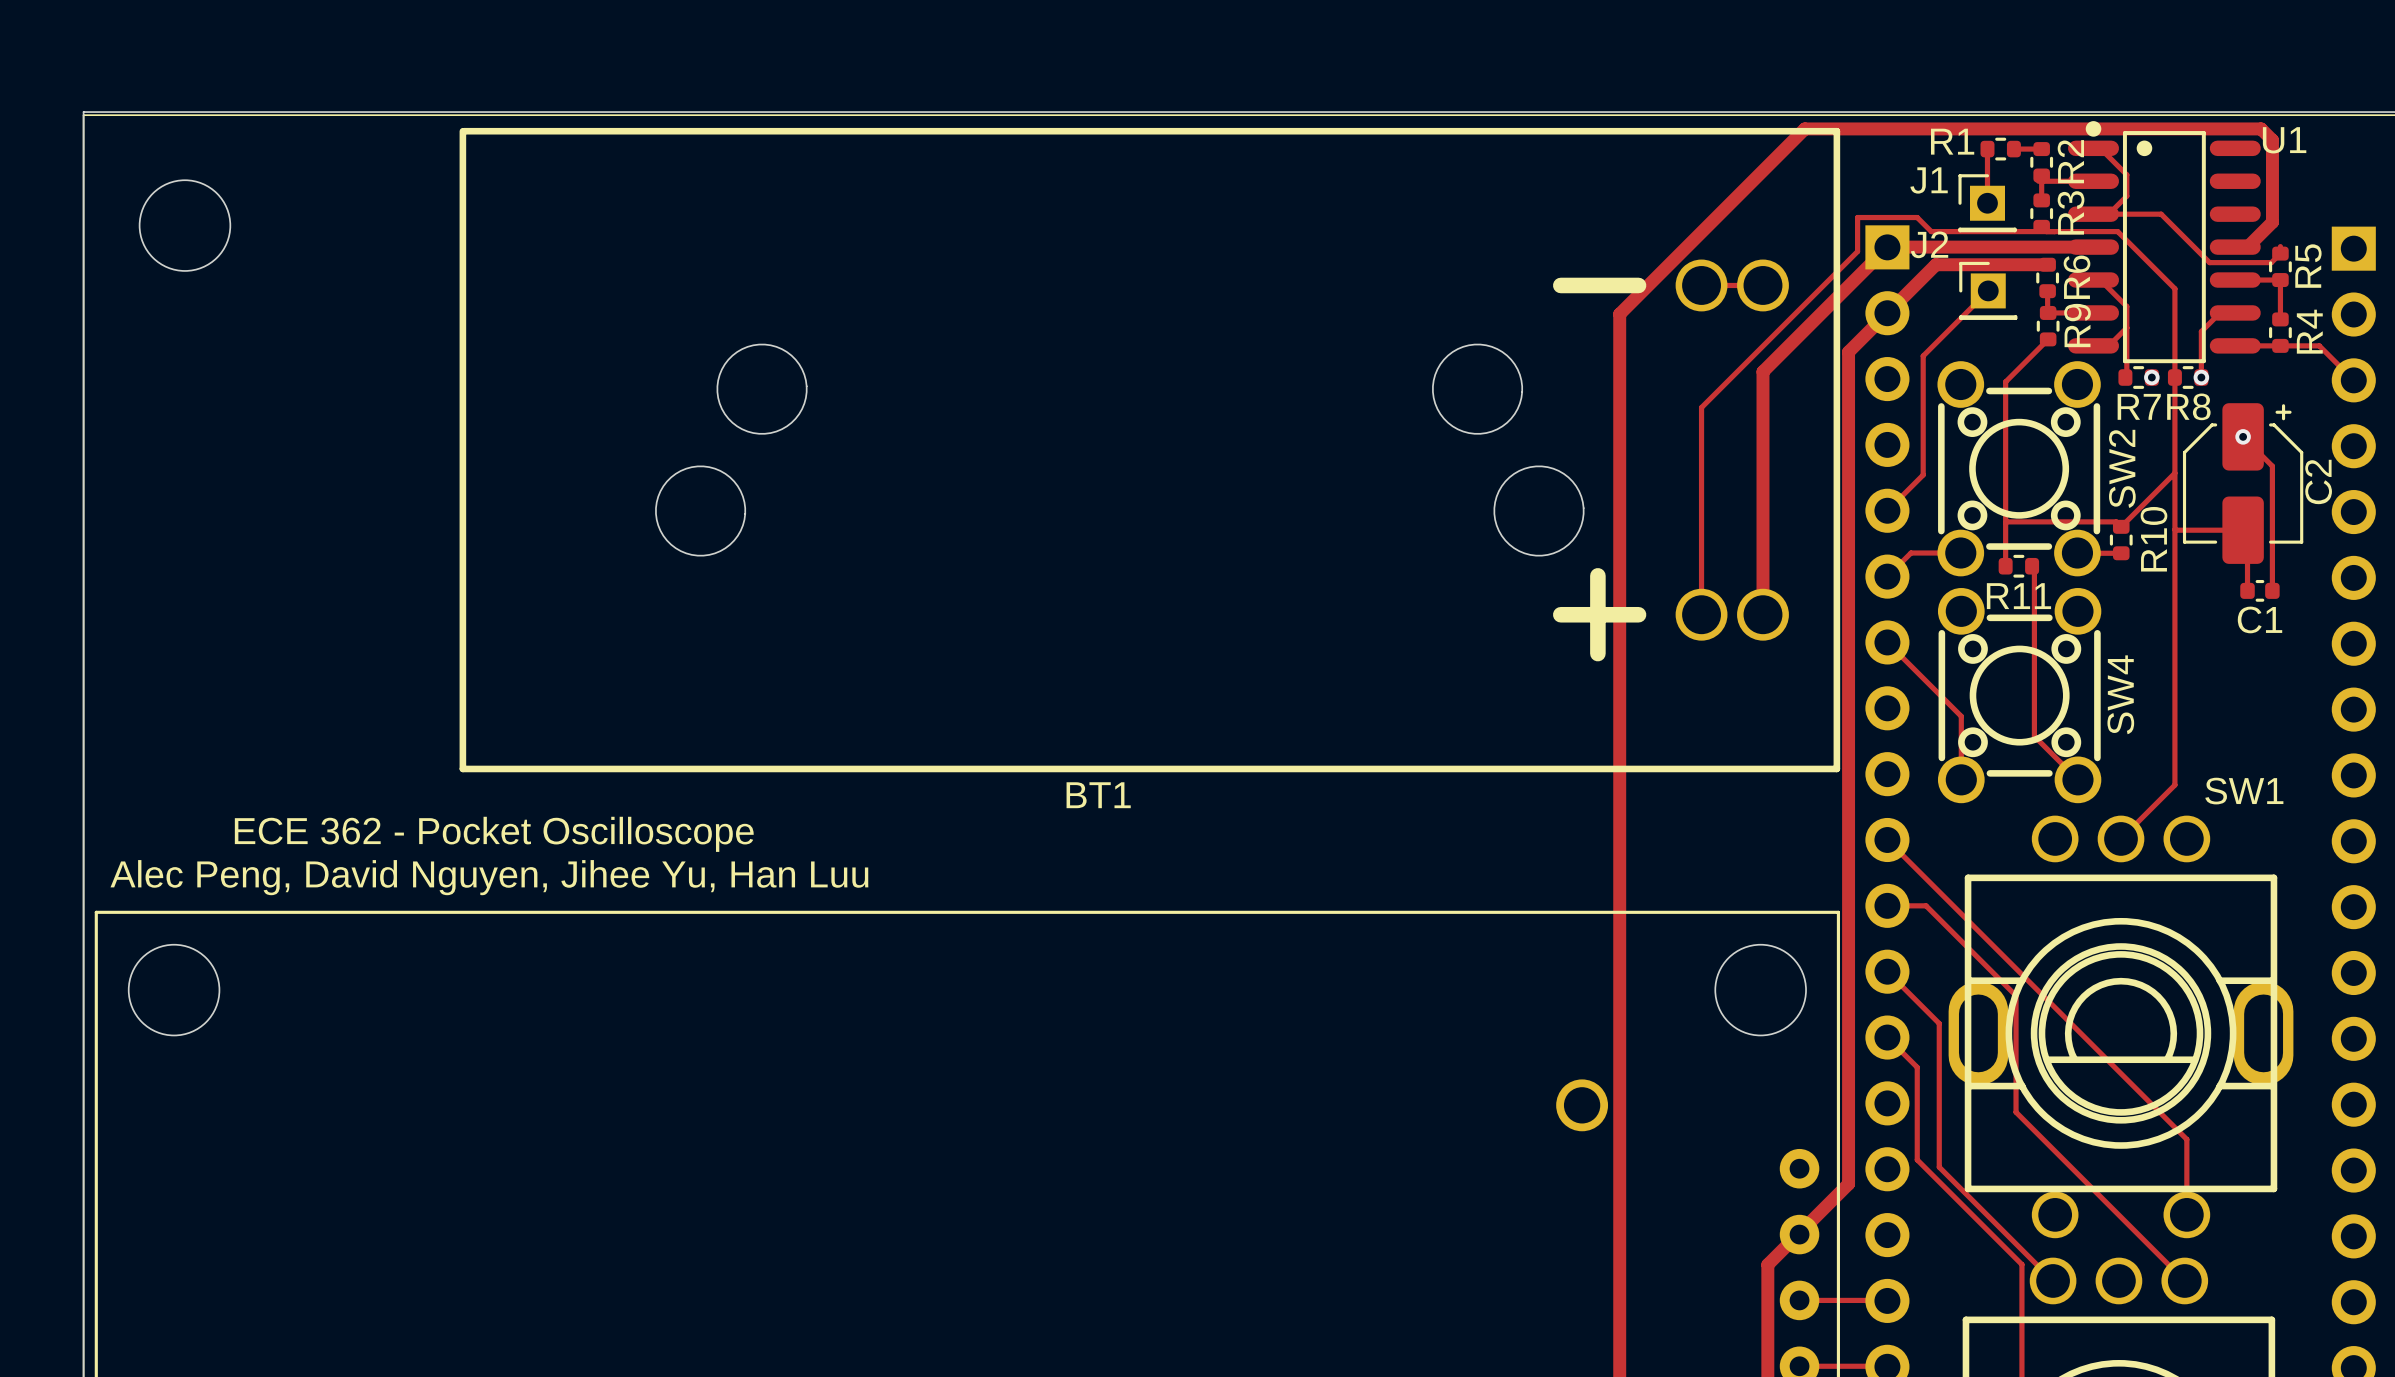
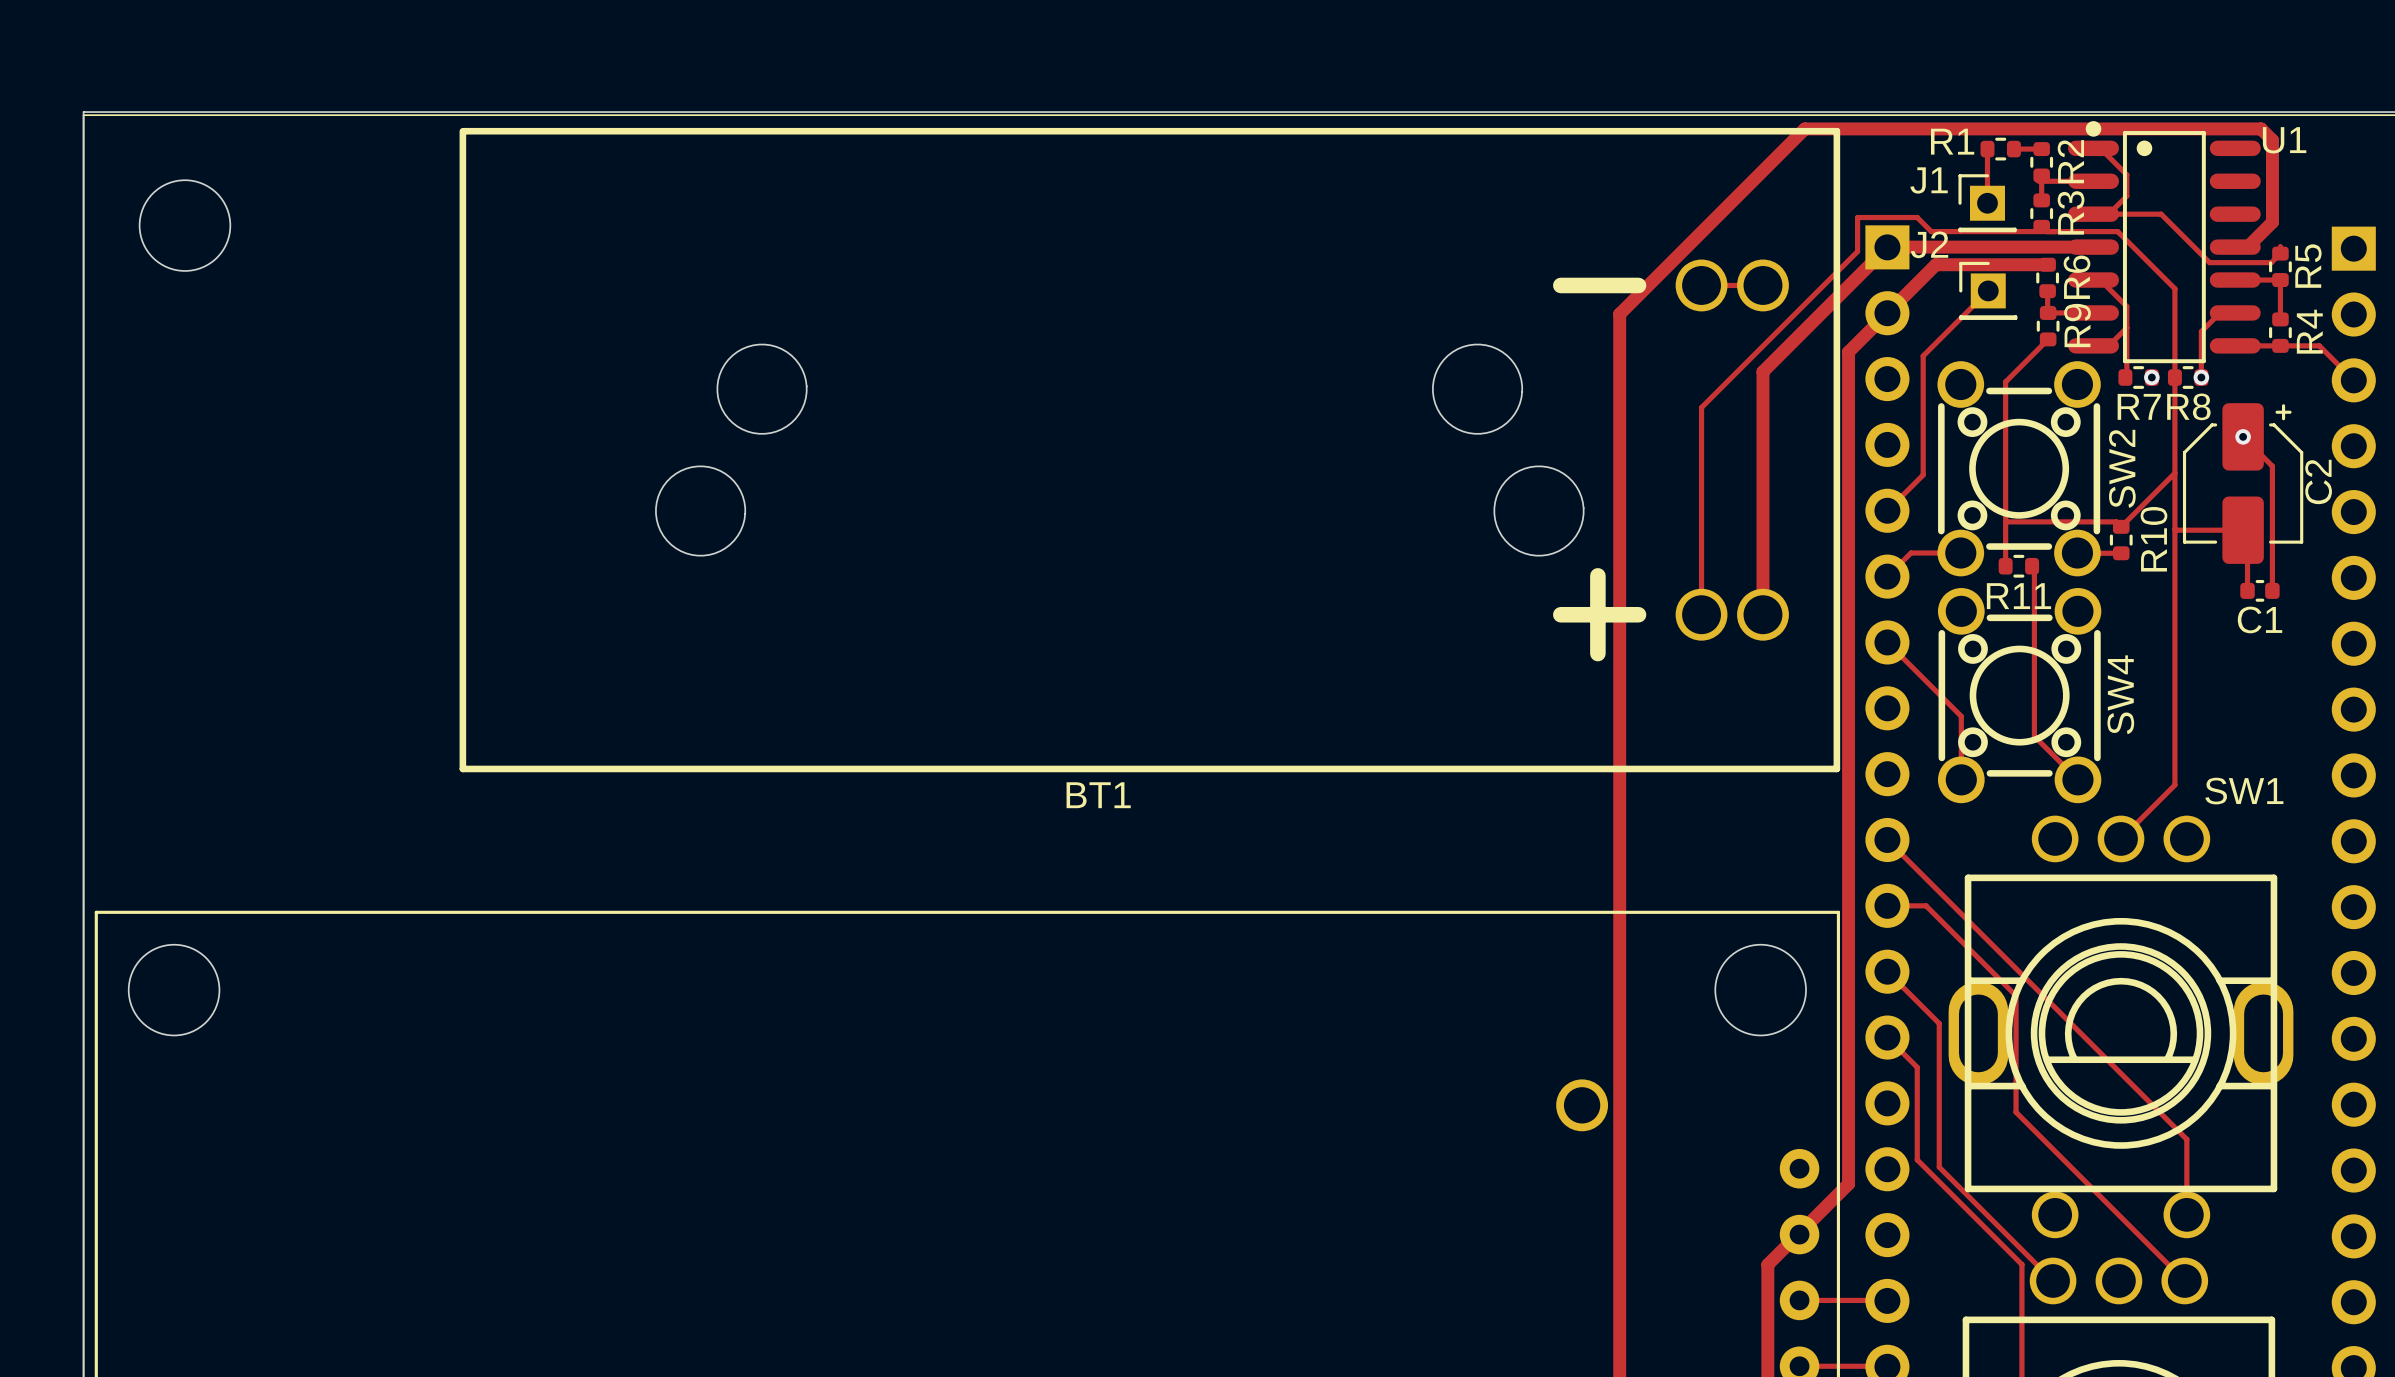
text: ECE 362 - Pocket Oscilloscope (494, 834) -> none
text: Alec Peng, David Nguyen, Jihee Yu, Han Luu (489, 877) -> none

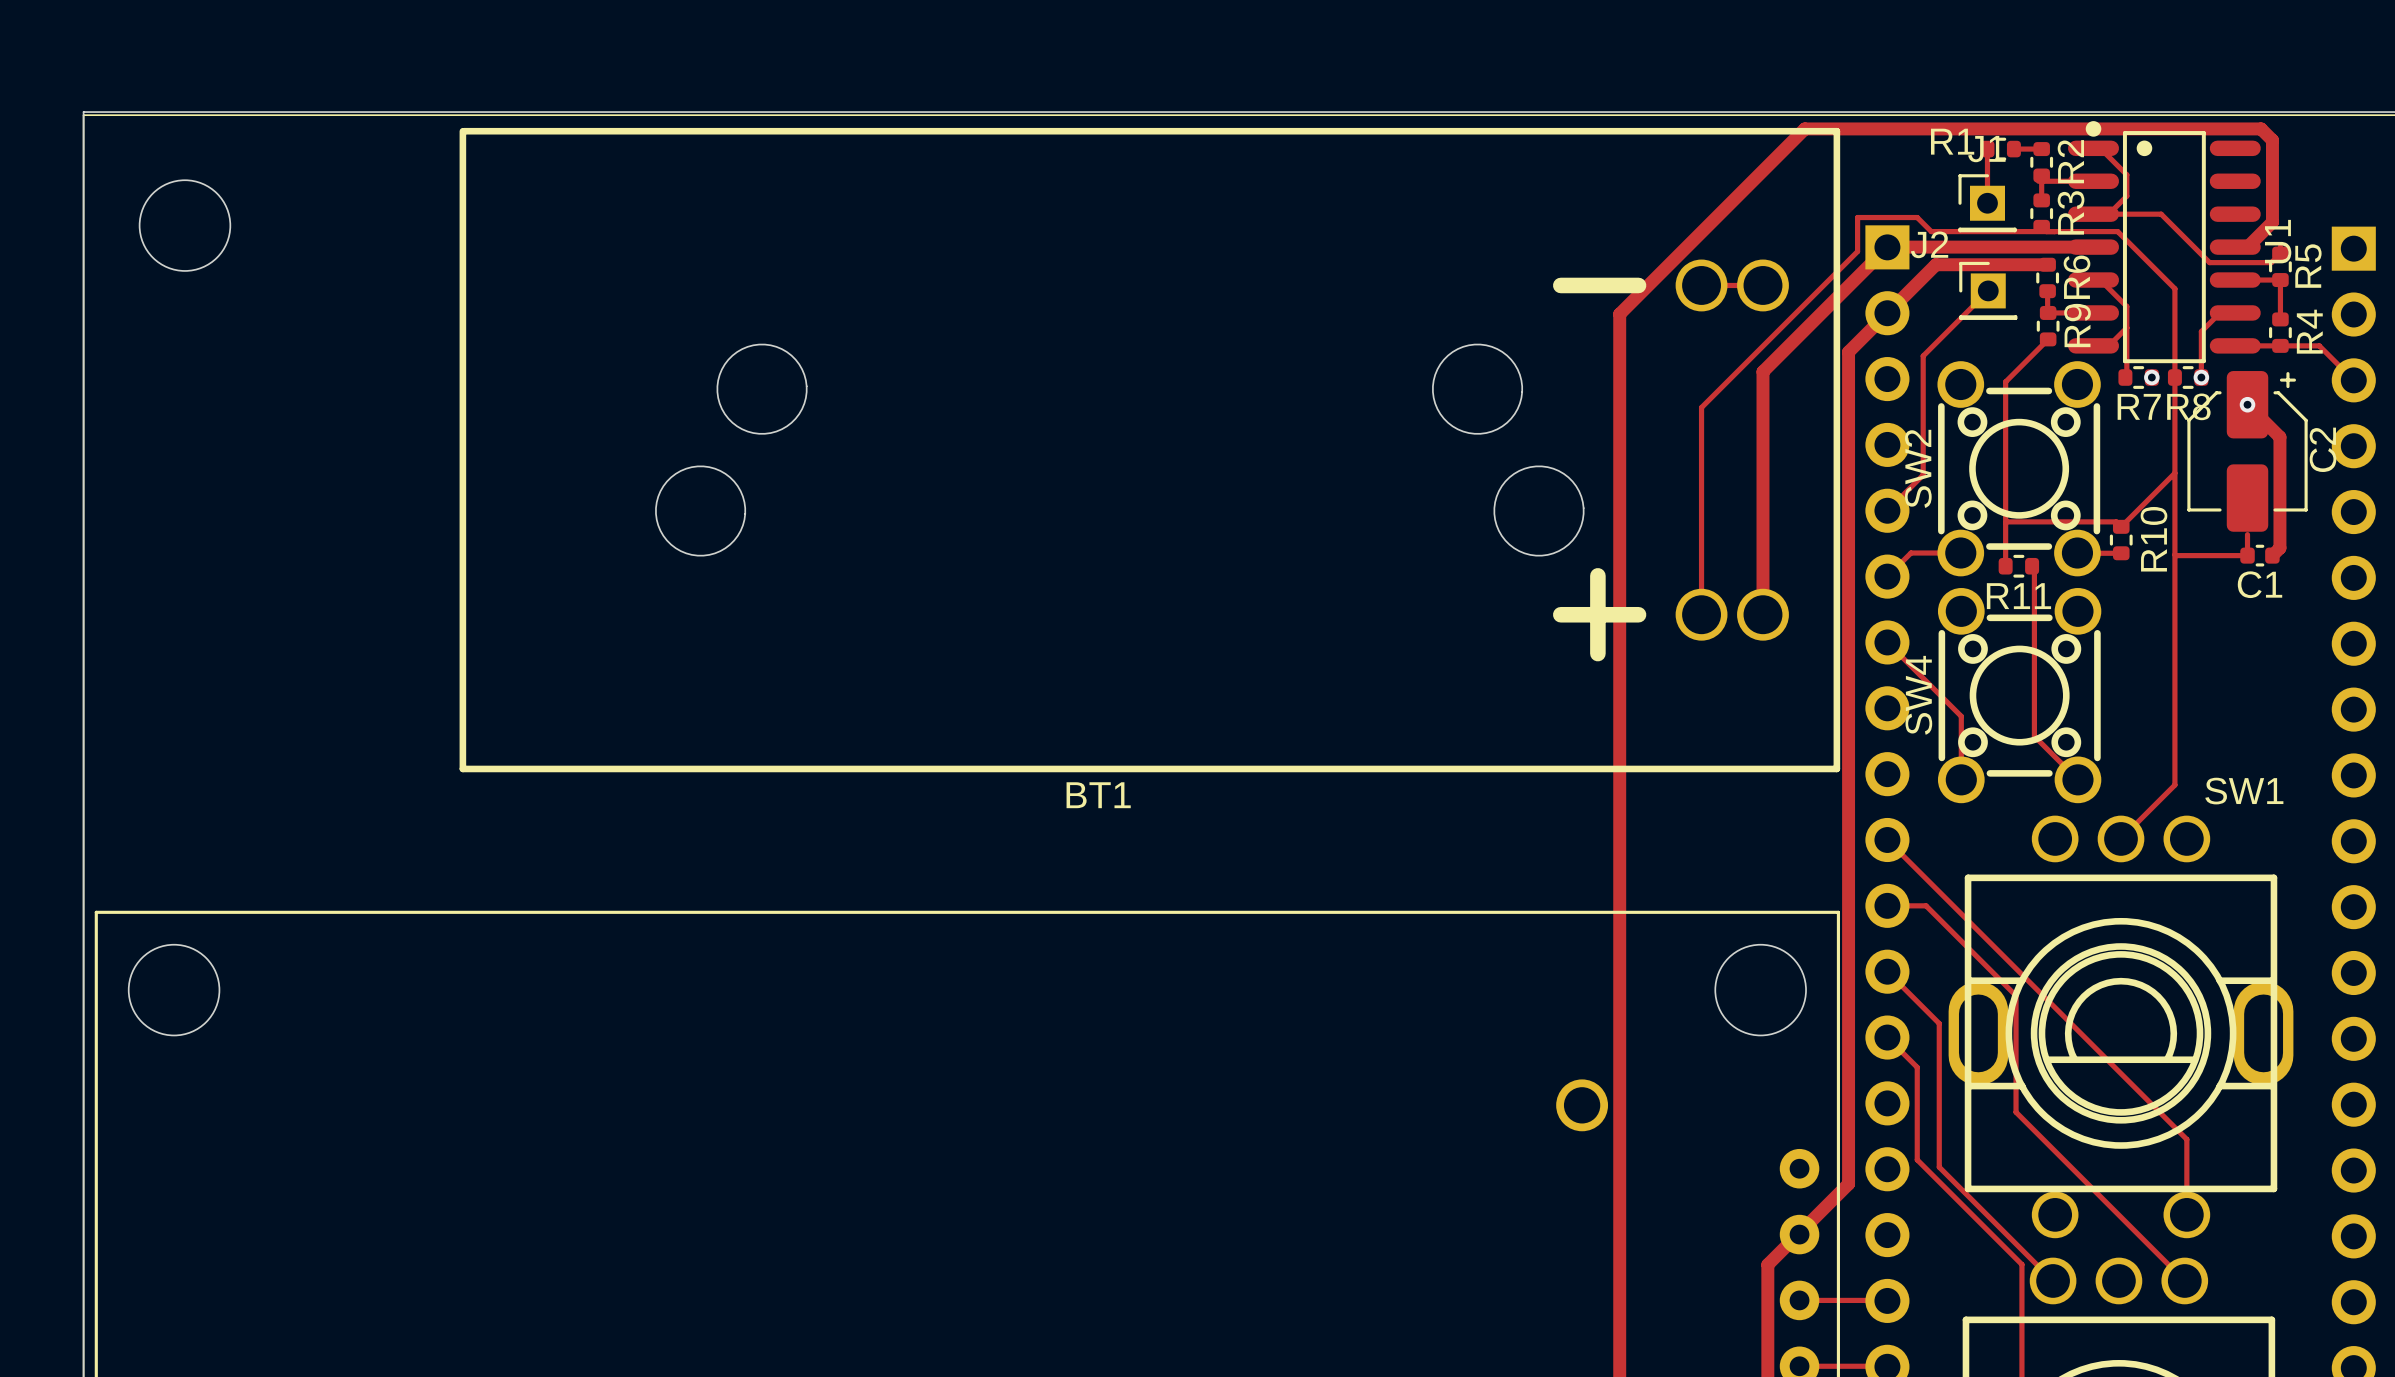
U1 name rotation: 0° (2284, 140) -> 90° counterclockwise (2278, 241)
U1 name position: U1 (2284, 140) -> U1 (2278, 241)
J1 name position: J1 (1929, 180) -> J1 (1986, 149)
track: none -> (2247, 404) (2279, 437) (2279, 548) (2272, 555)
track: (2243, 436) (2272, 466) (2272, 590) -> none
via position: (2243, 436) -> (2247, 404)
SW2 name position: SW2 (2122, 468) -> SW2 (1918, 468)
C2 position: (2243, 483) -> (2247, 451)
track: (2175, 530) (2243, 530) -> none
track: (2247, 555) (2247, 590) -> (2247, 555) (2174, 554)
C1 position: (2259, 590) -> (2259, 555)
SW4 name position: SW4 (2120, 694) -> SW4 (1918, 695)

